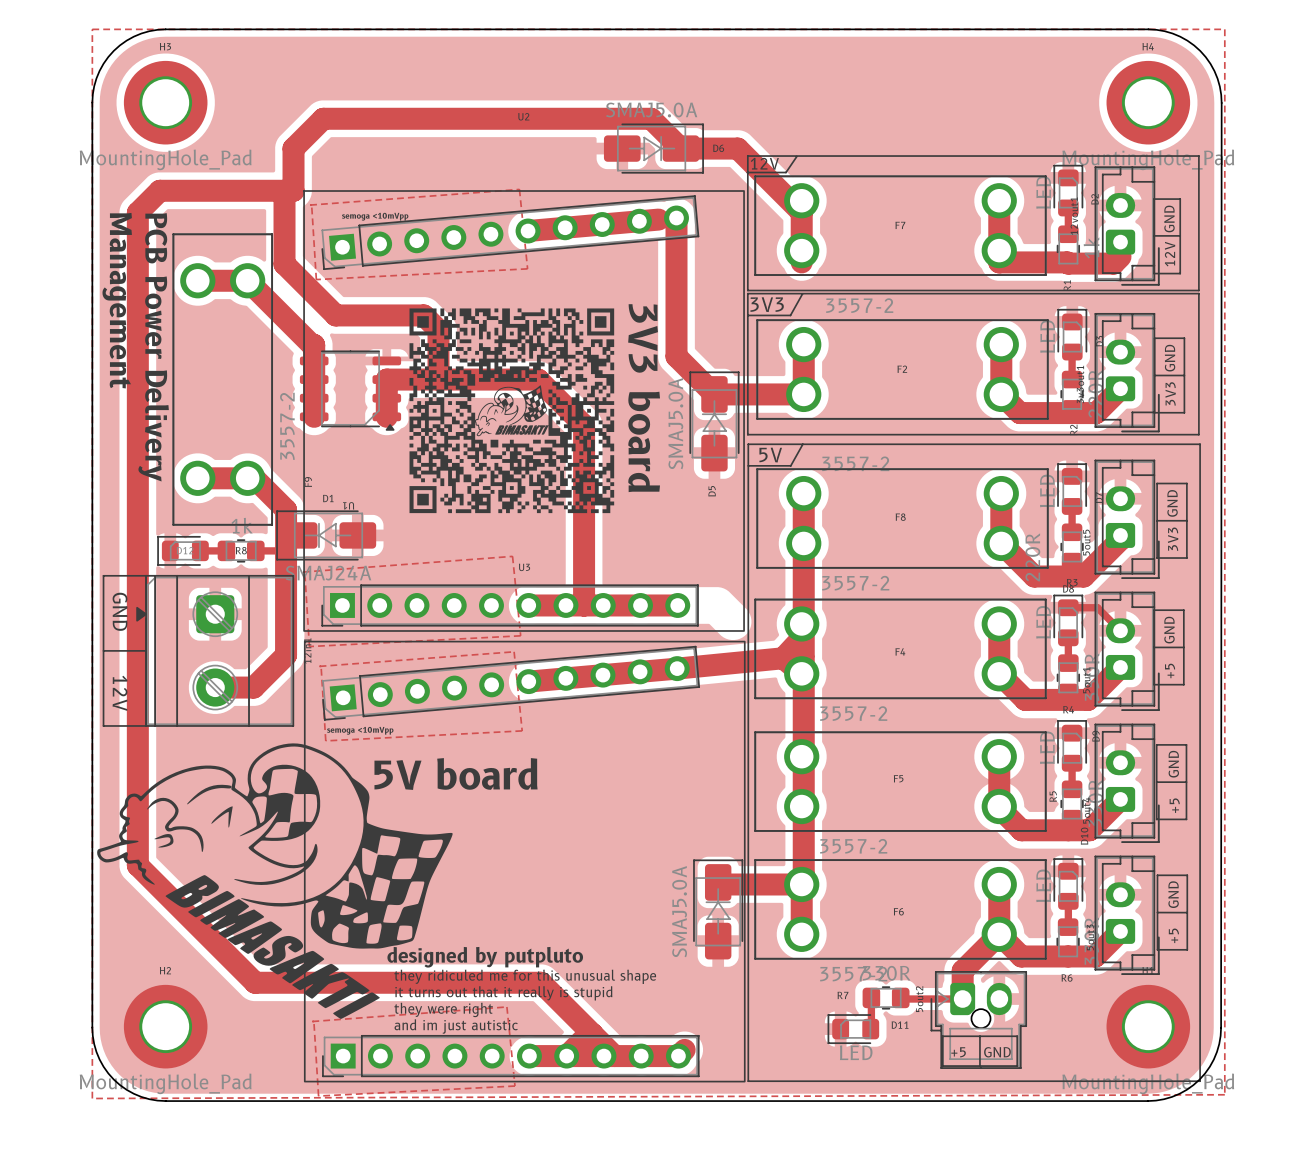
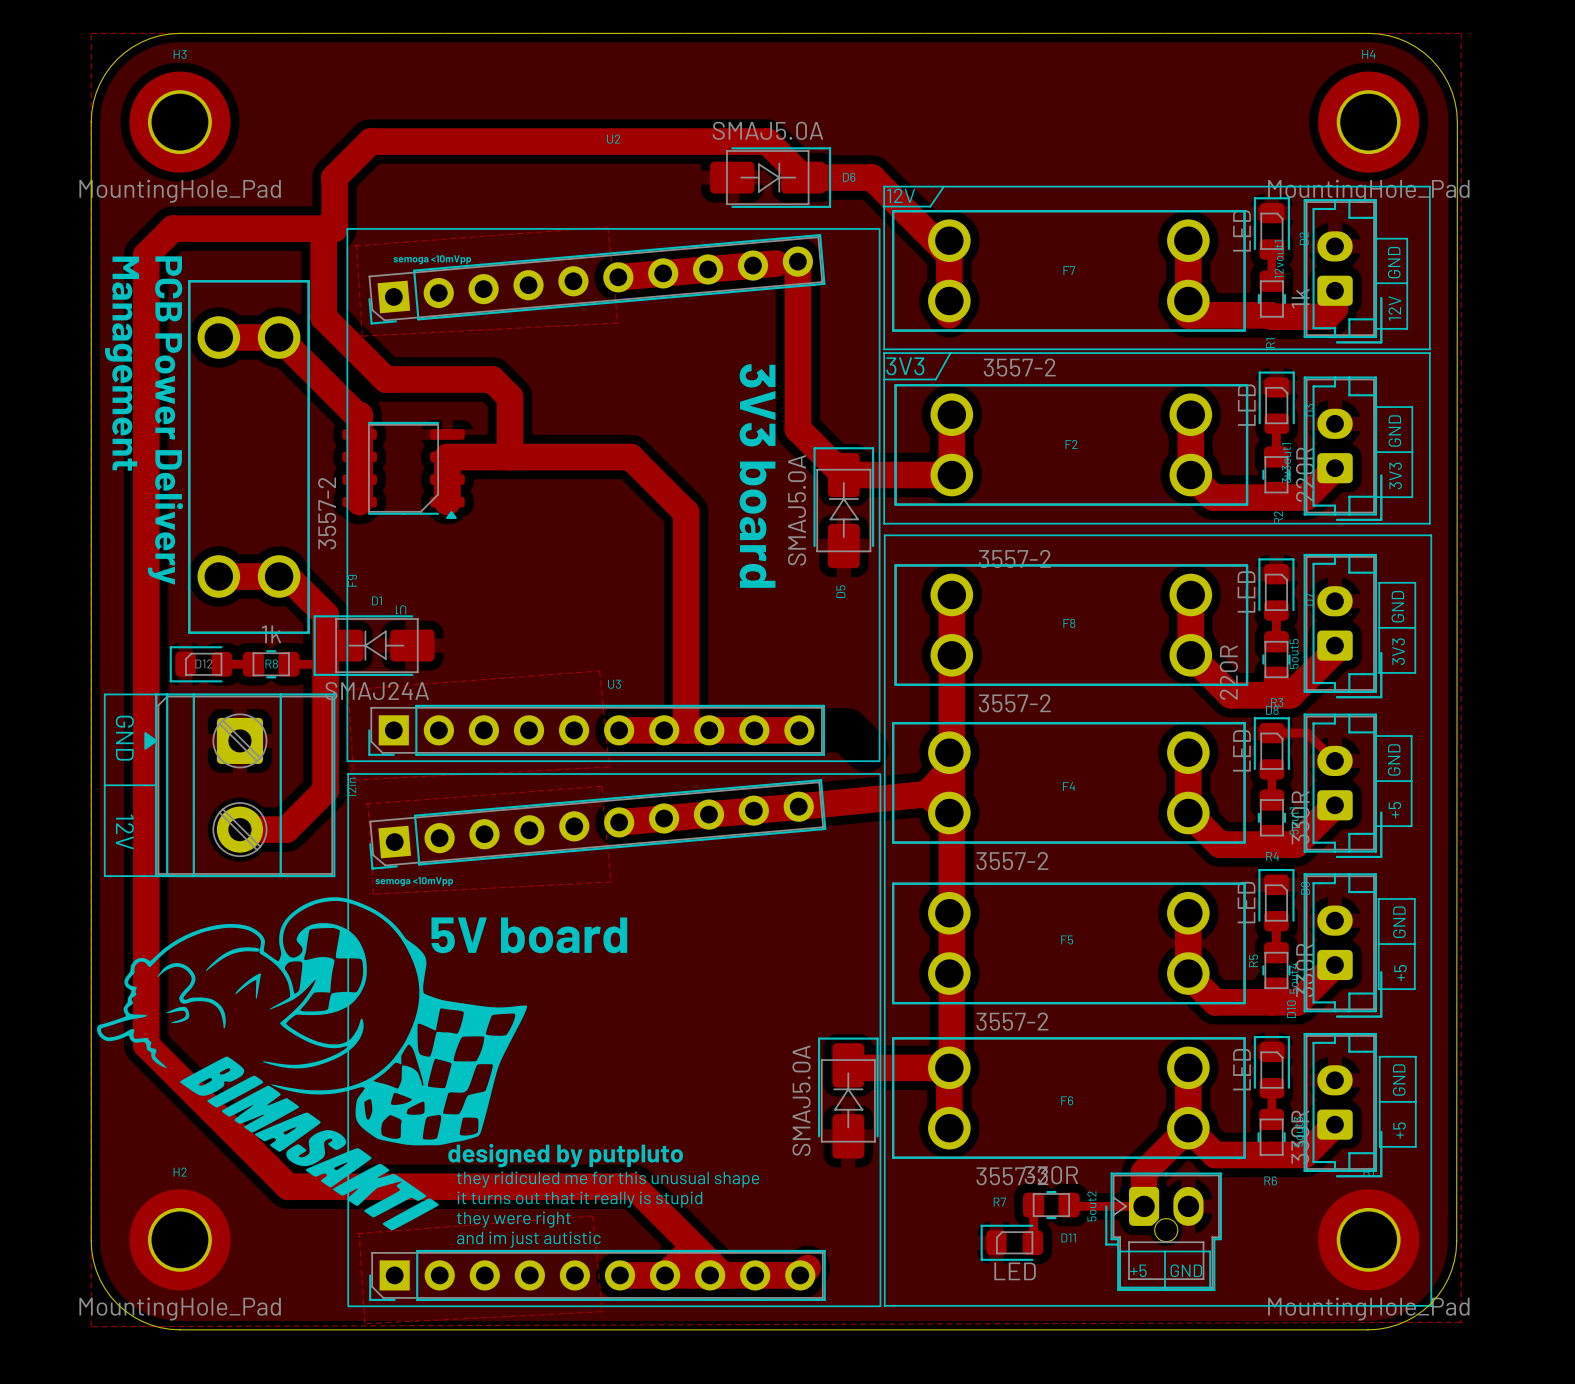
drawing: [409, 308, 615, 514] -> none
line: (802, 444) (790, 465) (748, 465) -> none
text: 5V (770, 455) -> none

